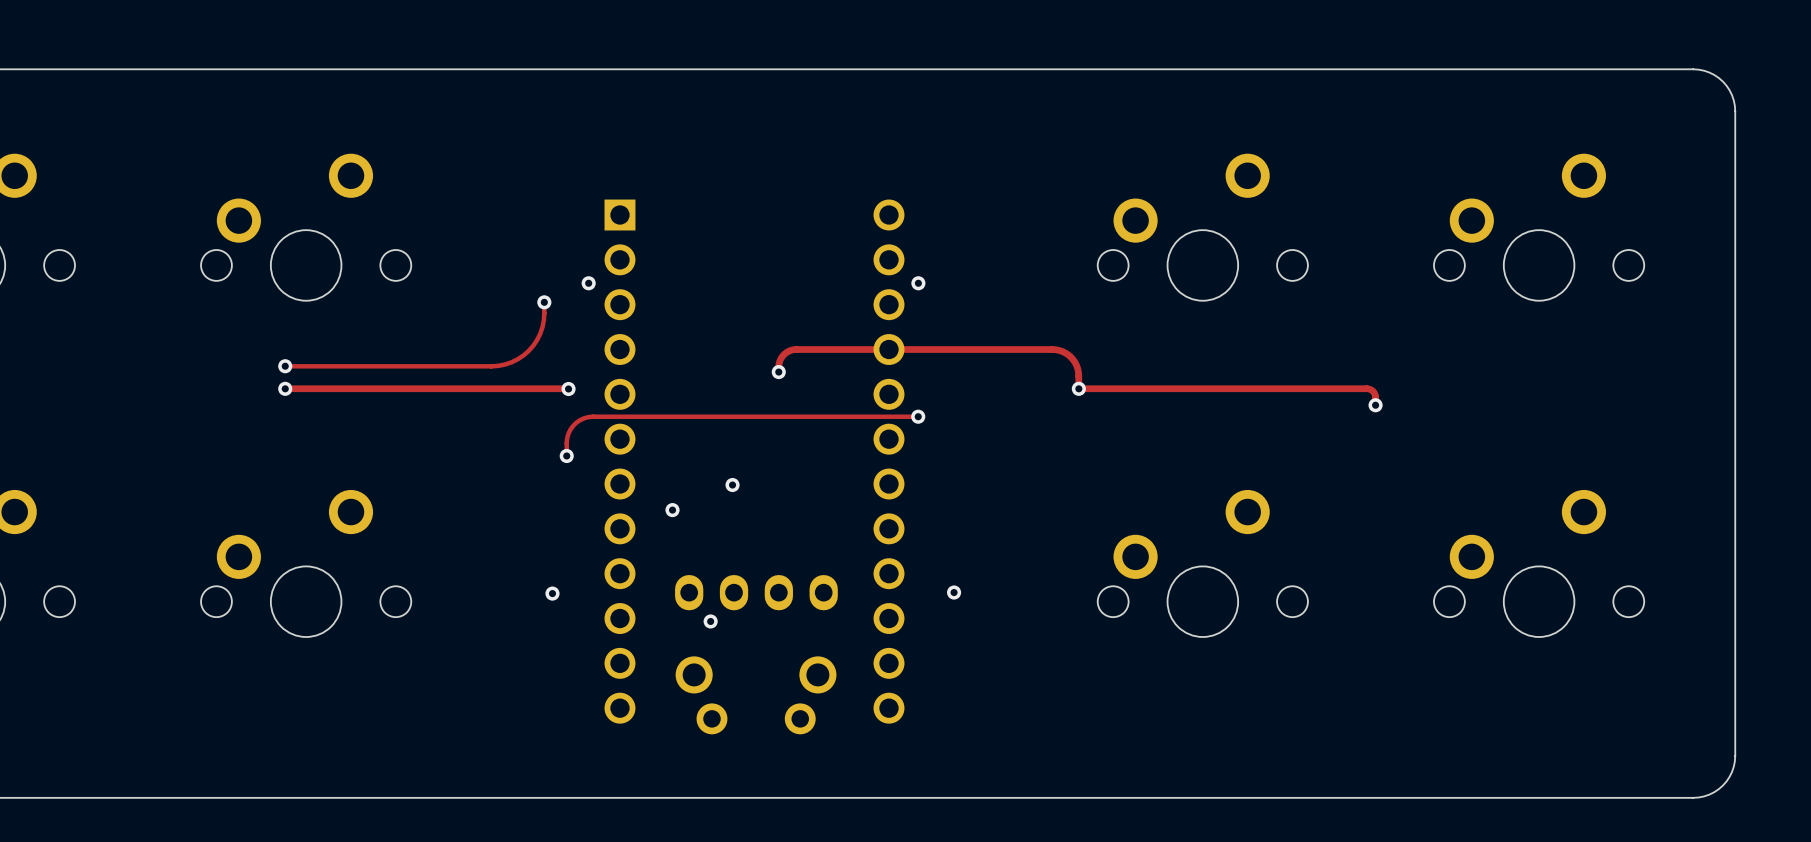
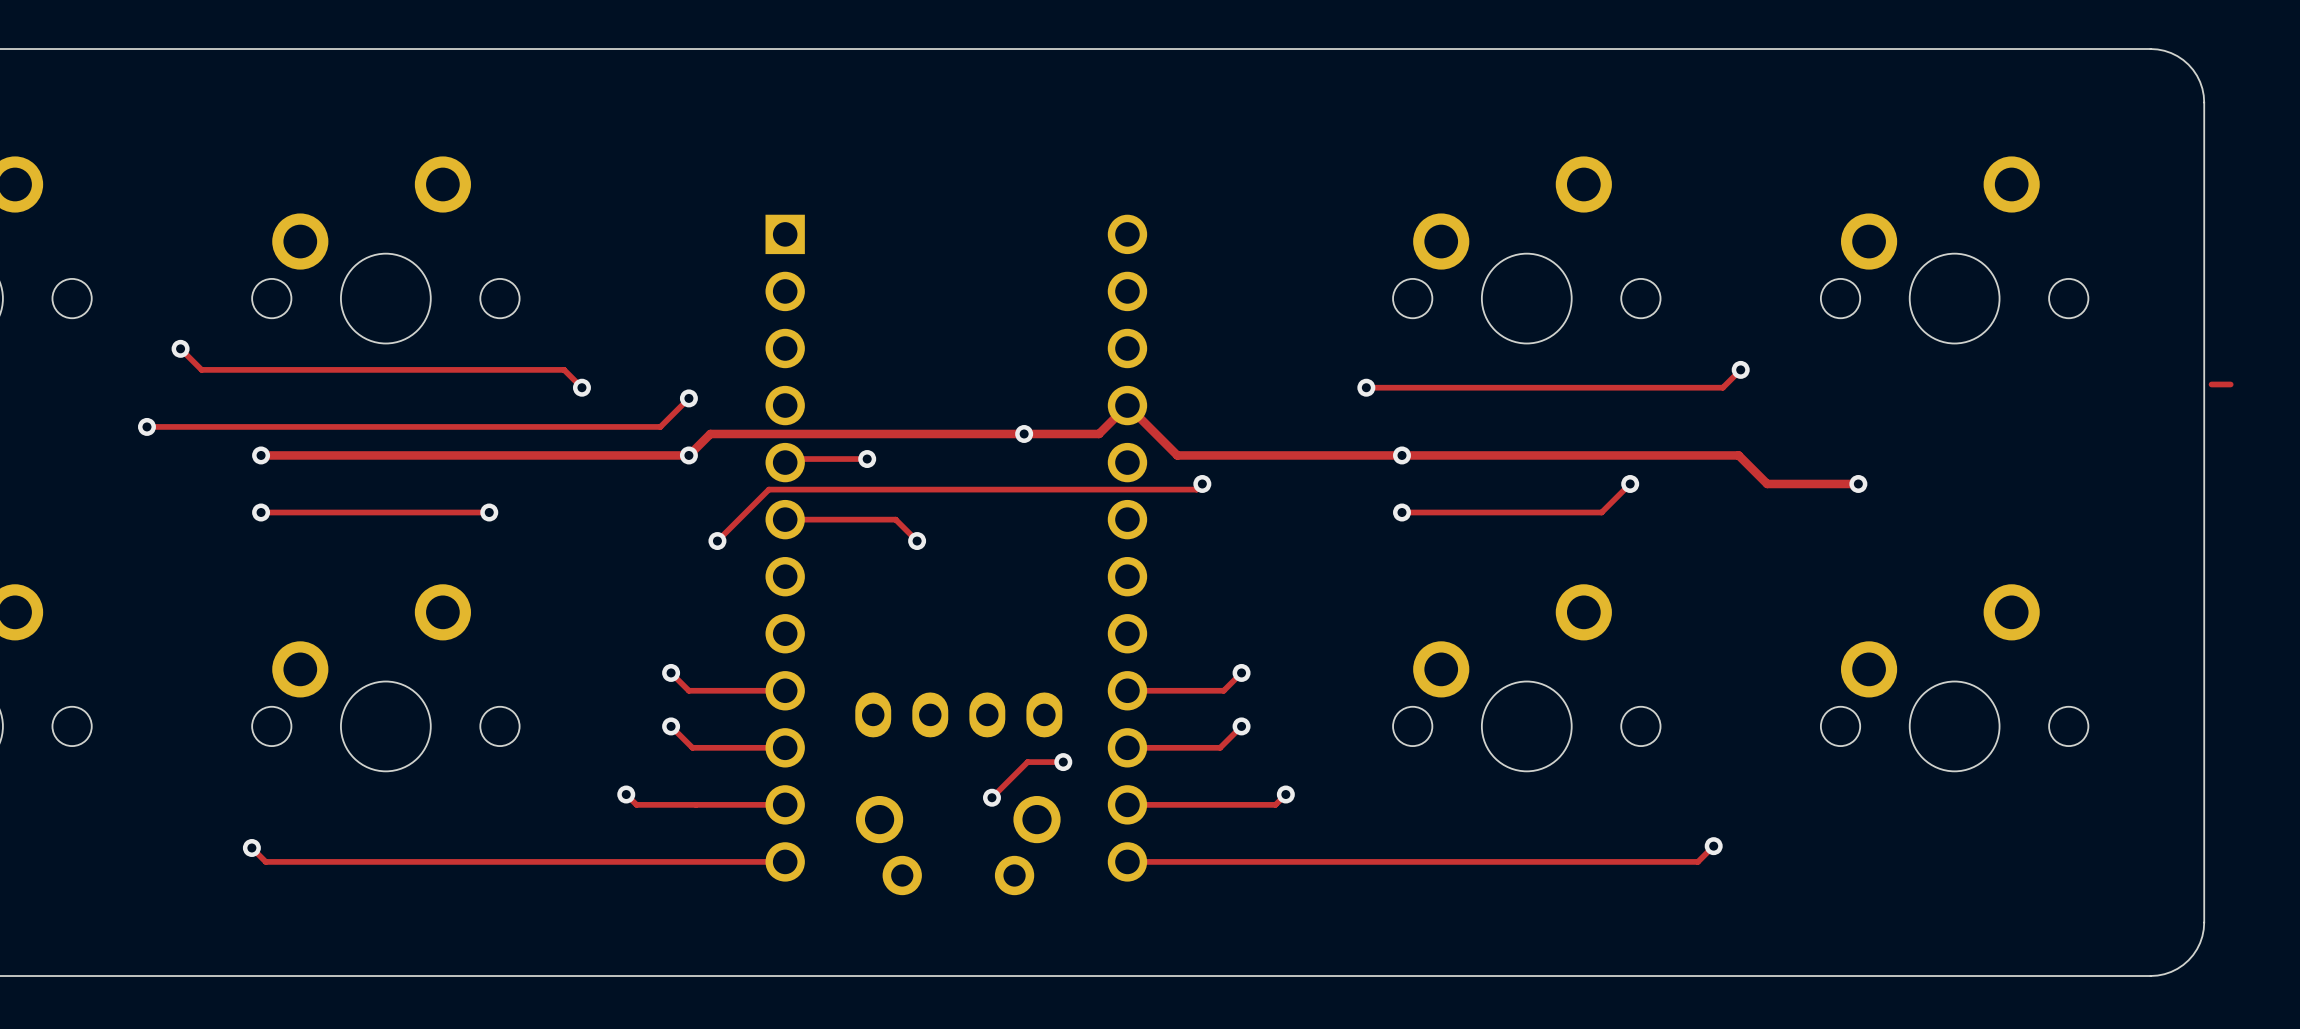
via: (588, 283) -> none
via: (918, 283) -> none
track: (544, 302) (542, 327) (533, 345) (523, 355) (511, 362) (491, 366) -> (688, 398) (660, 426) (621, 426)
via: (544, 302) -> none
track: none -> (180, 348) (201, 369) (564, 369) (581, 387)
via: none -> (180, 348)
track: none -> (1740, 369) (1722, 387) (1366, 387)
via: none -> (1740, 369)
track: none -> (2211, 384) (2230, 384)
via: none -> (581, 387)
via: none -> (1366, 387)
via: none -> (688, 398)
track: none -> (146, 426) (359, 426)
via: none -> (146, 426)
via: (285, 366) -> none
track: (778, 372) (781, 357) (787, 352) (794, 349) (1052, 349) (1062, 351) (1073, 359) (1078, 372) (1078, 388) -> (688, 455) (710, 433) (1099, 433) (1127, 405) (1177, 455) (1369, 455)
via position: (778, 372) -> (1024, 433)
track: none -> (261, 455) (359, 455)
via: none -> (261, 455)
via: (285, 388) -> none
track: (544, 388) (568, 389) -> none
via: (1078, 388) -> none
via: none -> (1402, 455)
track: (1366, 388) (1374, 393) (1375, 405) -> (1735, 455) (1738, 455) (1767, 483) (1858, 483)
via position: (568, 389) -> (688, 455)
track: none -> (867, 459) (788, 459) (785, 462)
via: none -> (867, 459)
via: (1375, 405) -> none
track: none -> (1630, 483) (1601, 512) (1402, 512)
via: none -> (1630, 483)
via: none -> (1858, 483)
track: (918, 416) (589, 416) (577, 422) (570, 429) (566, 439) (566, 455) -> (1202, 483) (1196, 489) (768, 489) (717, 541)
via position: (918, 416) -> (1202, 483)
track: none -> (261, 512) (489, 512)
via: none -> (261, 512)
via: none -> (489, 512)
via: none -> (1402, 512)
track: none -> (785, 519) (895, 519) (917, 541)
via position: (732, 485) -> (917, 541)
via: (672, 510) -> none
track: none -> (671, 672) (688, 690) (785, 690)
via: none -> (671, 672)
track: none -> (1241, 672) (1223, 690) (1127, 690)
via: none -> (1241, 672)
via: (954, 592) -> none
via: (552, 593) -> none
track: none -> (671, 726) (692, 747) (785, 747)
via: none -> (671, 726)
track: none -> (1241, 726) (1220, 747) (1127, 747)
via: none -> (1241, 726)
via: (710, 621) -> none
track: none -> (1063, 762) (1027, 762) (991, 797)
via: none -> (1063, 762)
track: none -> (626, 794) (636, 804) (785, 804)
via: none -> (626, 794)
track: none -> (1285, 794) (1275, 804) (1127, 804)
via: none -> (1285, 794)
via: none -> (991, 797)
track: none -> (1713, 846) (1697, 861) (1127, 861)
via: none -> (1713, 846)
track: none -> (251, 847) (265, 861) (785, 861)
via: none -> (251, 847)

